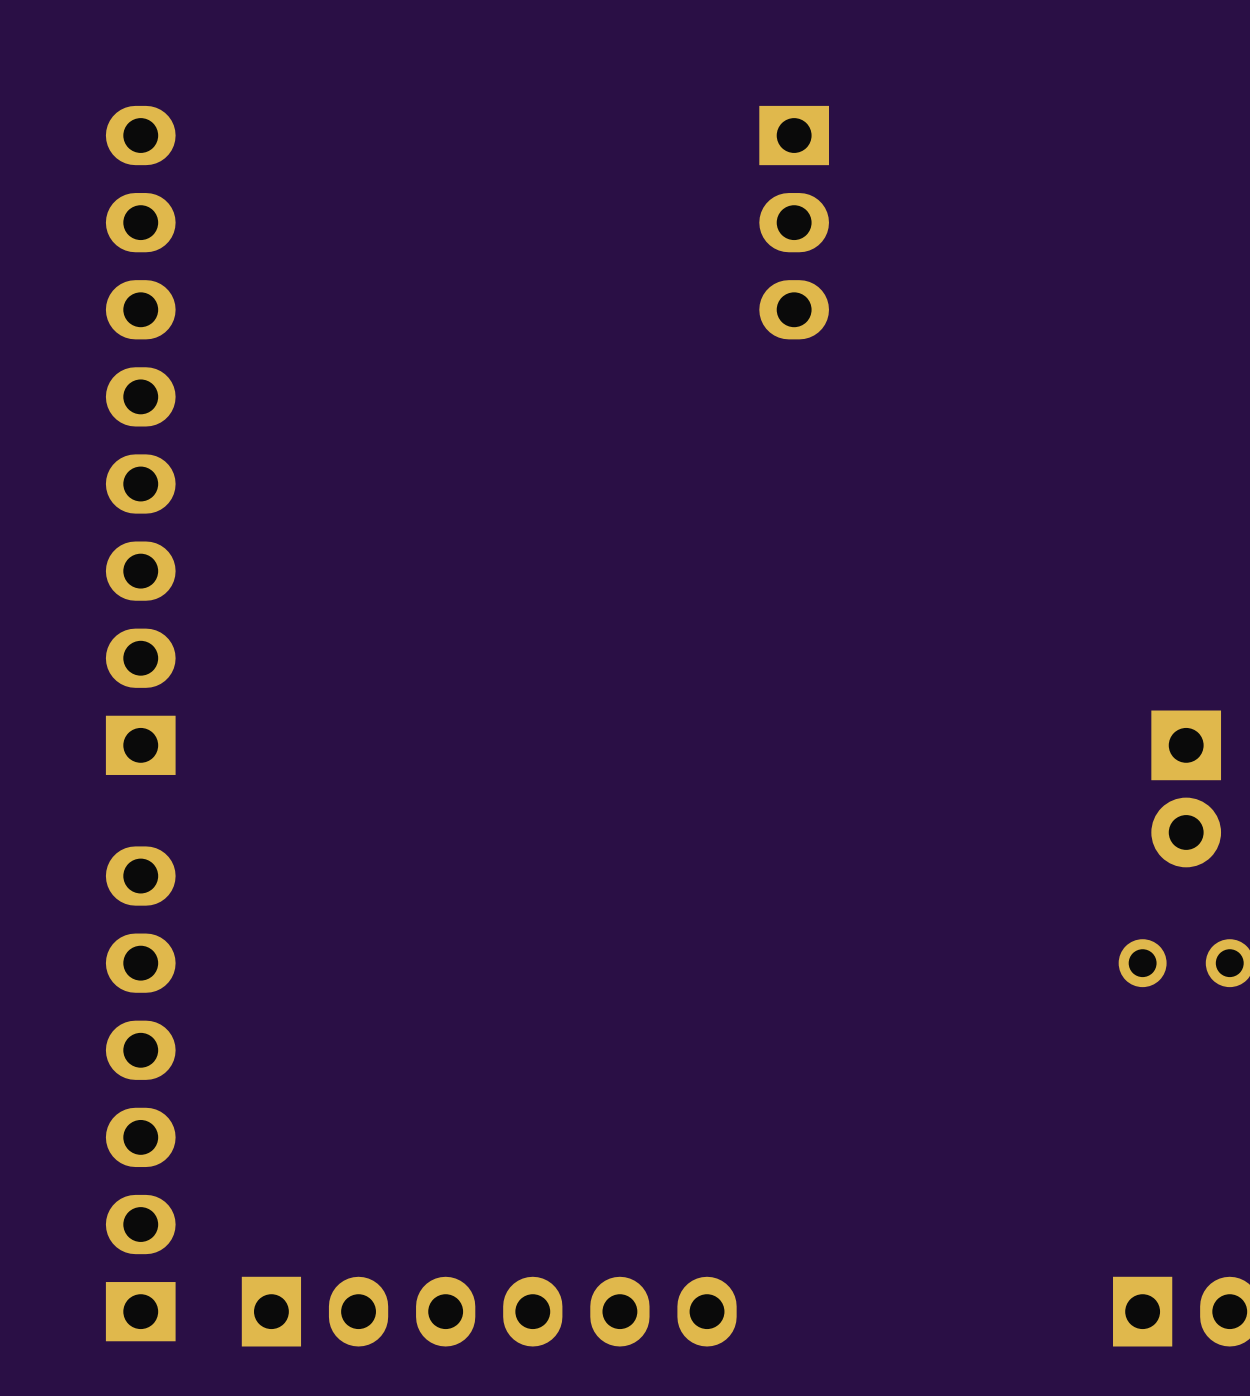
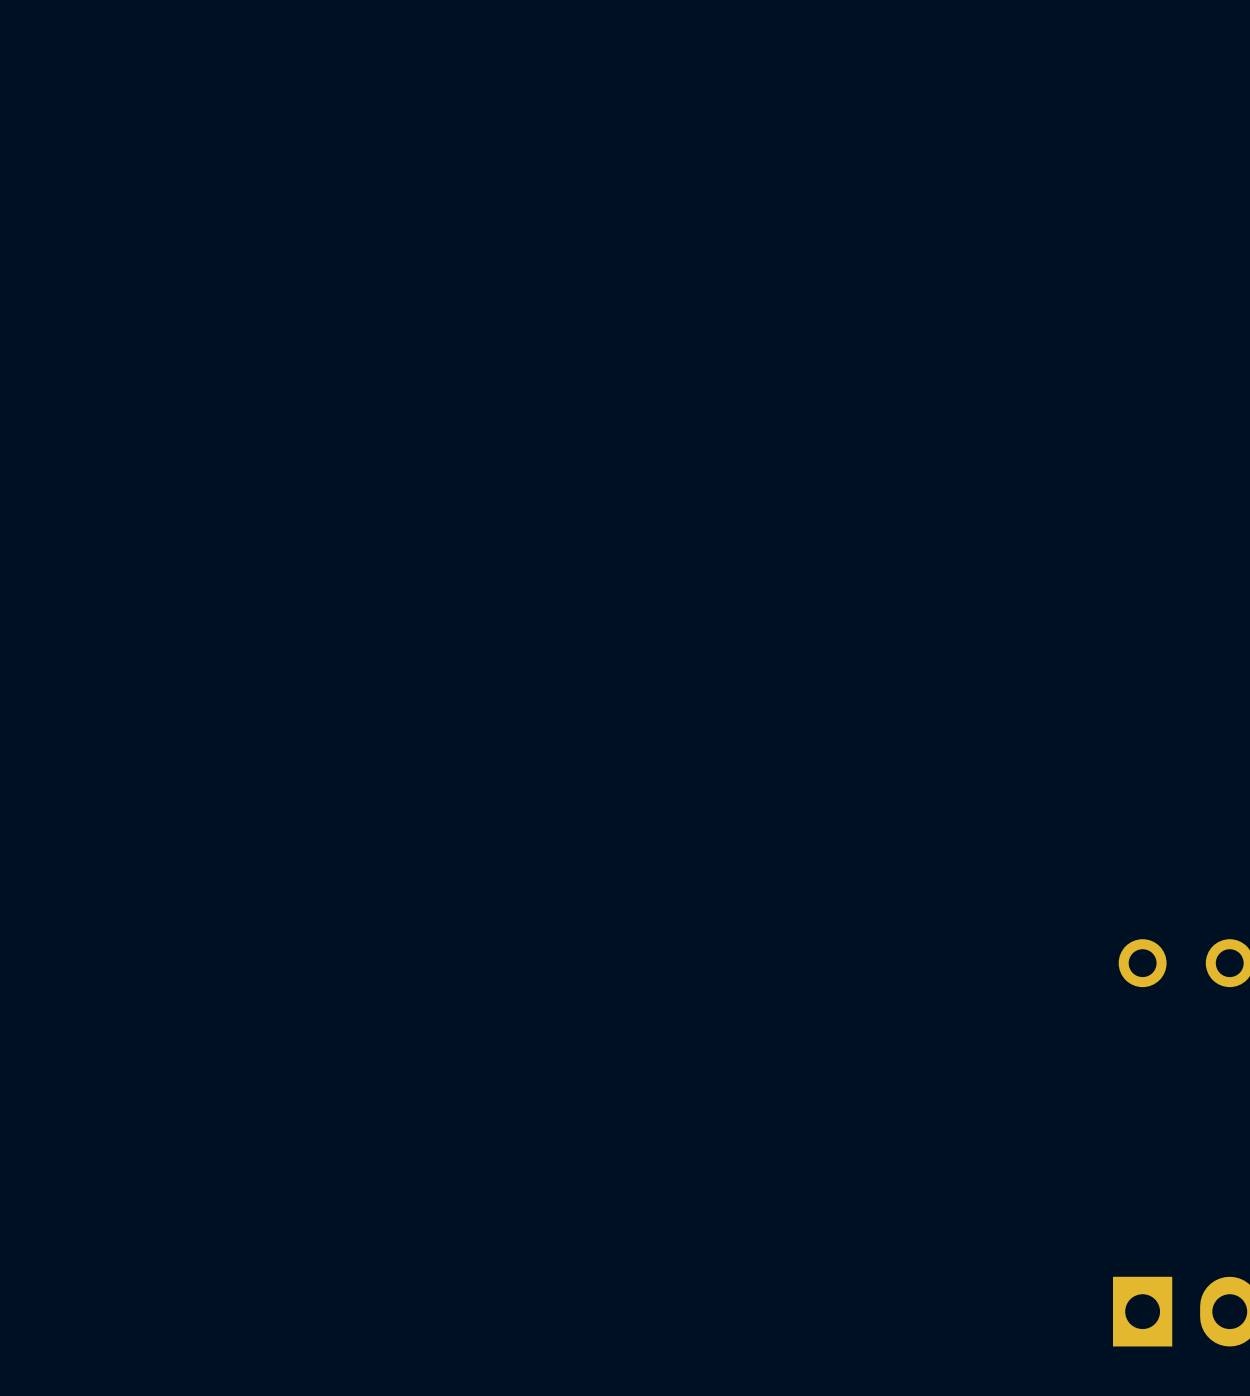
part: (794, 222) -> none
part: (140, 440) -> none
part: (1186, 788) -> none
part: (140, 1093) -> none
part: (489, 1311) -> none

